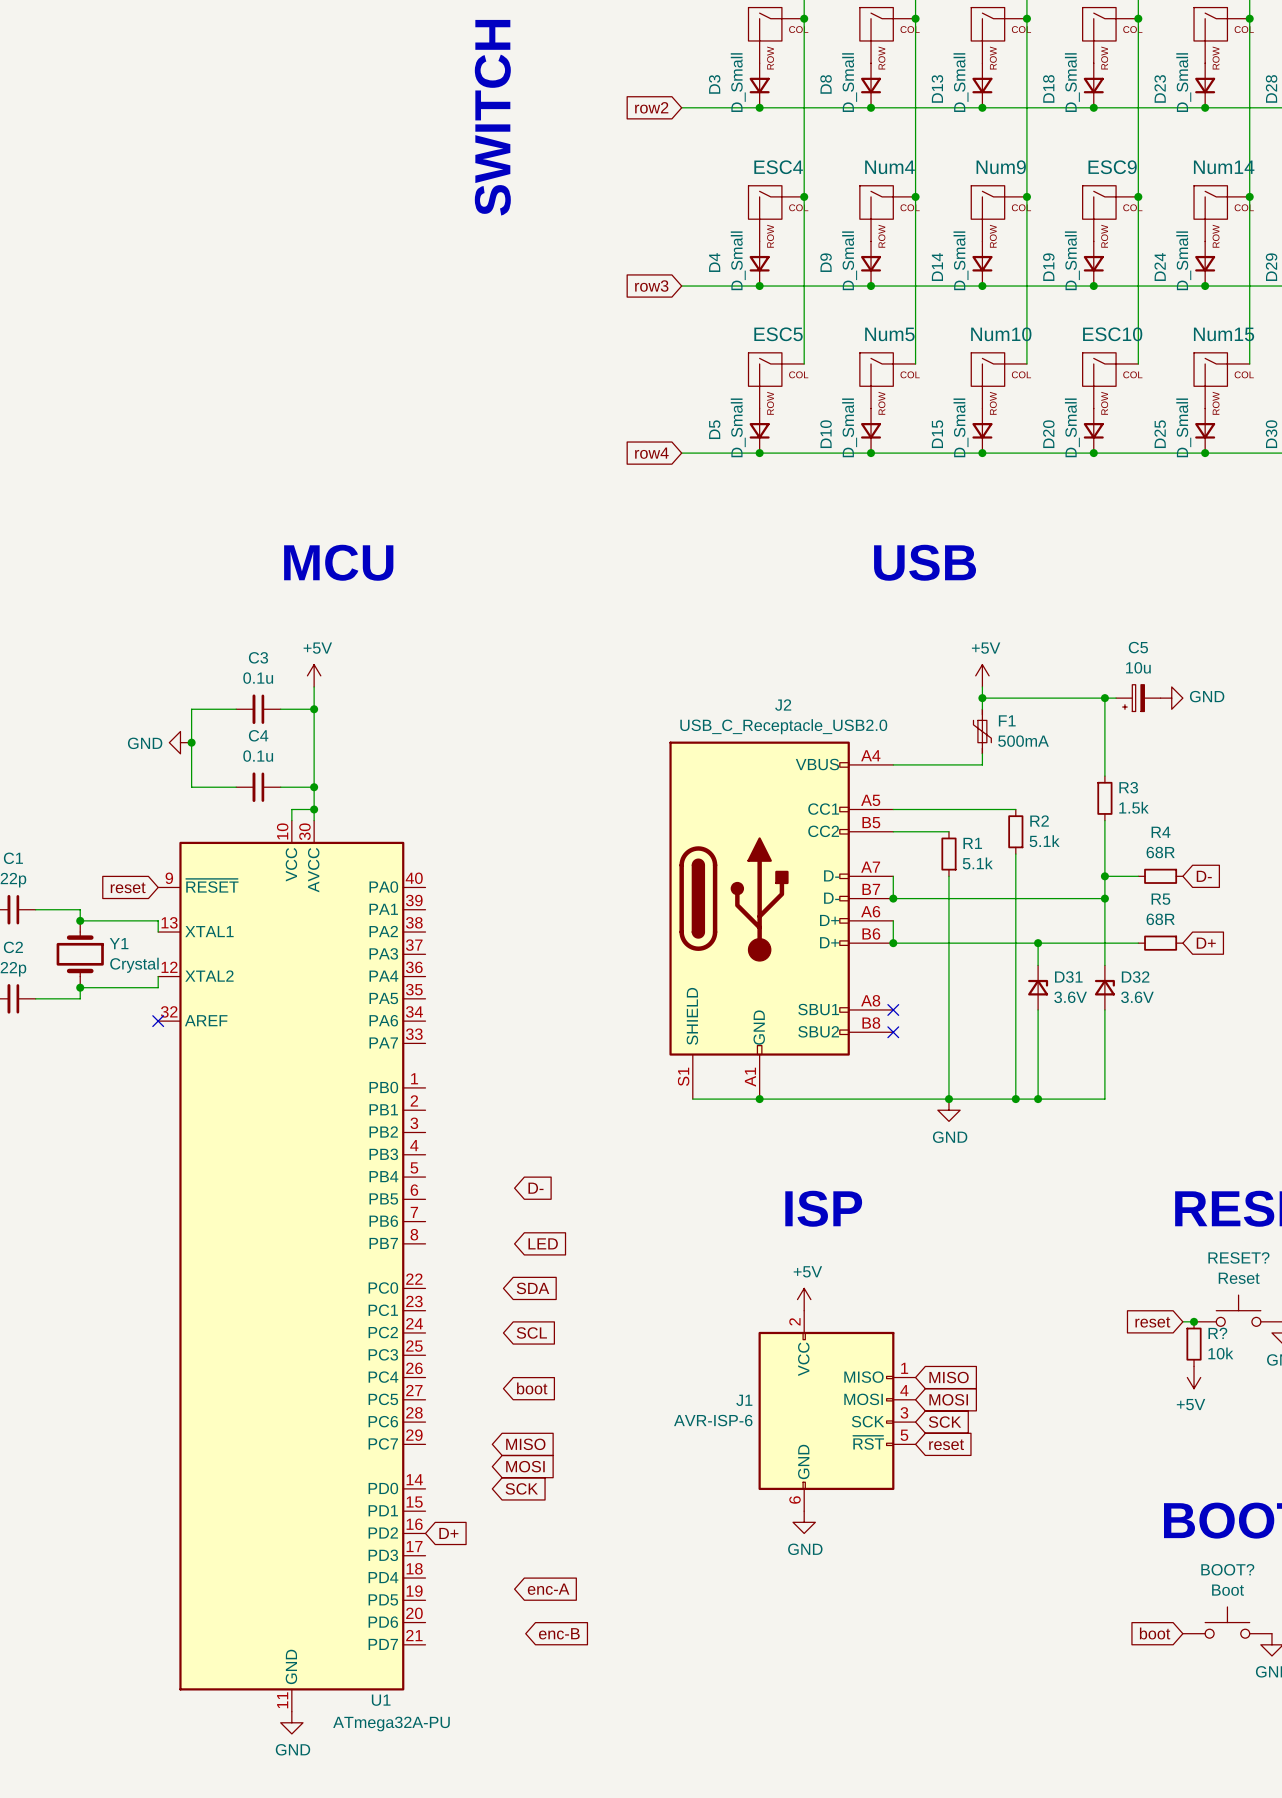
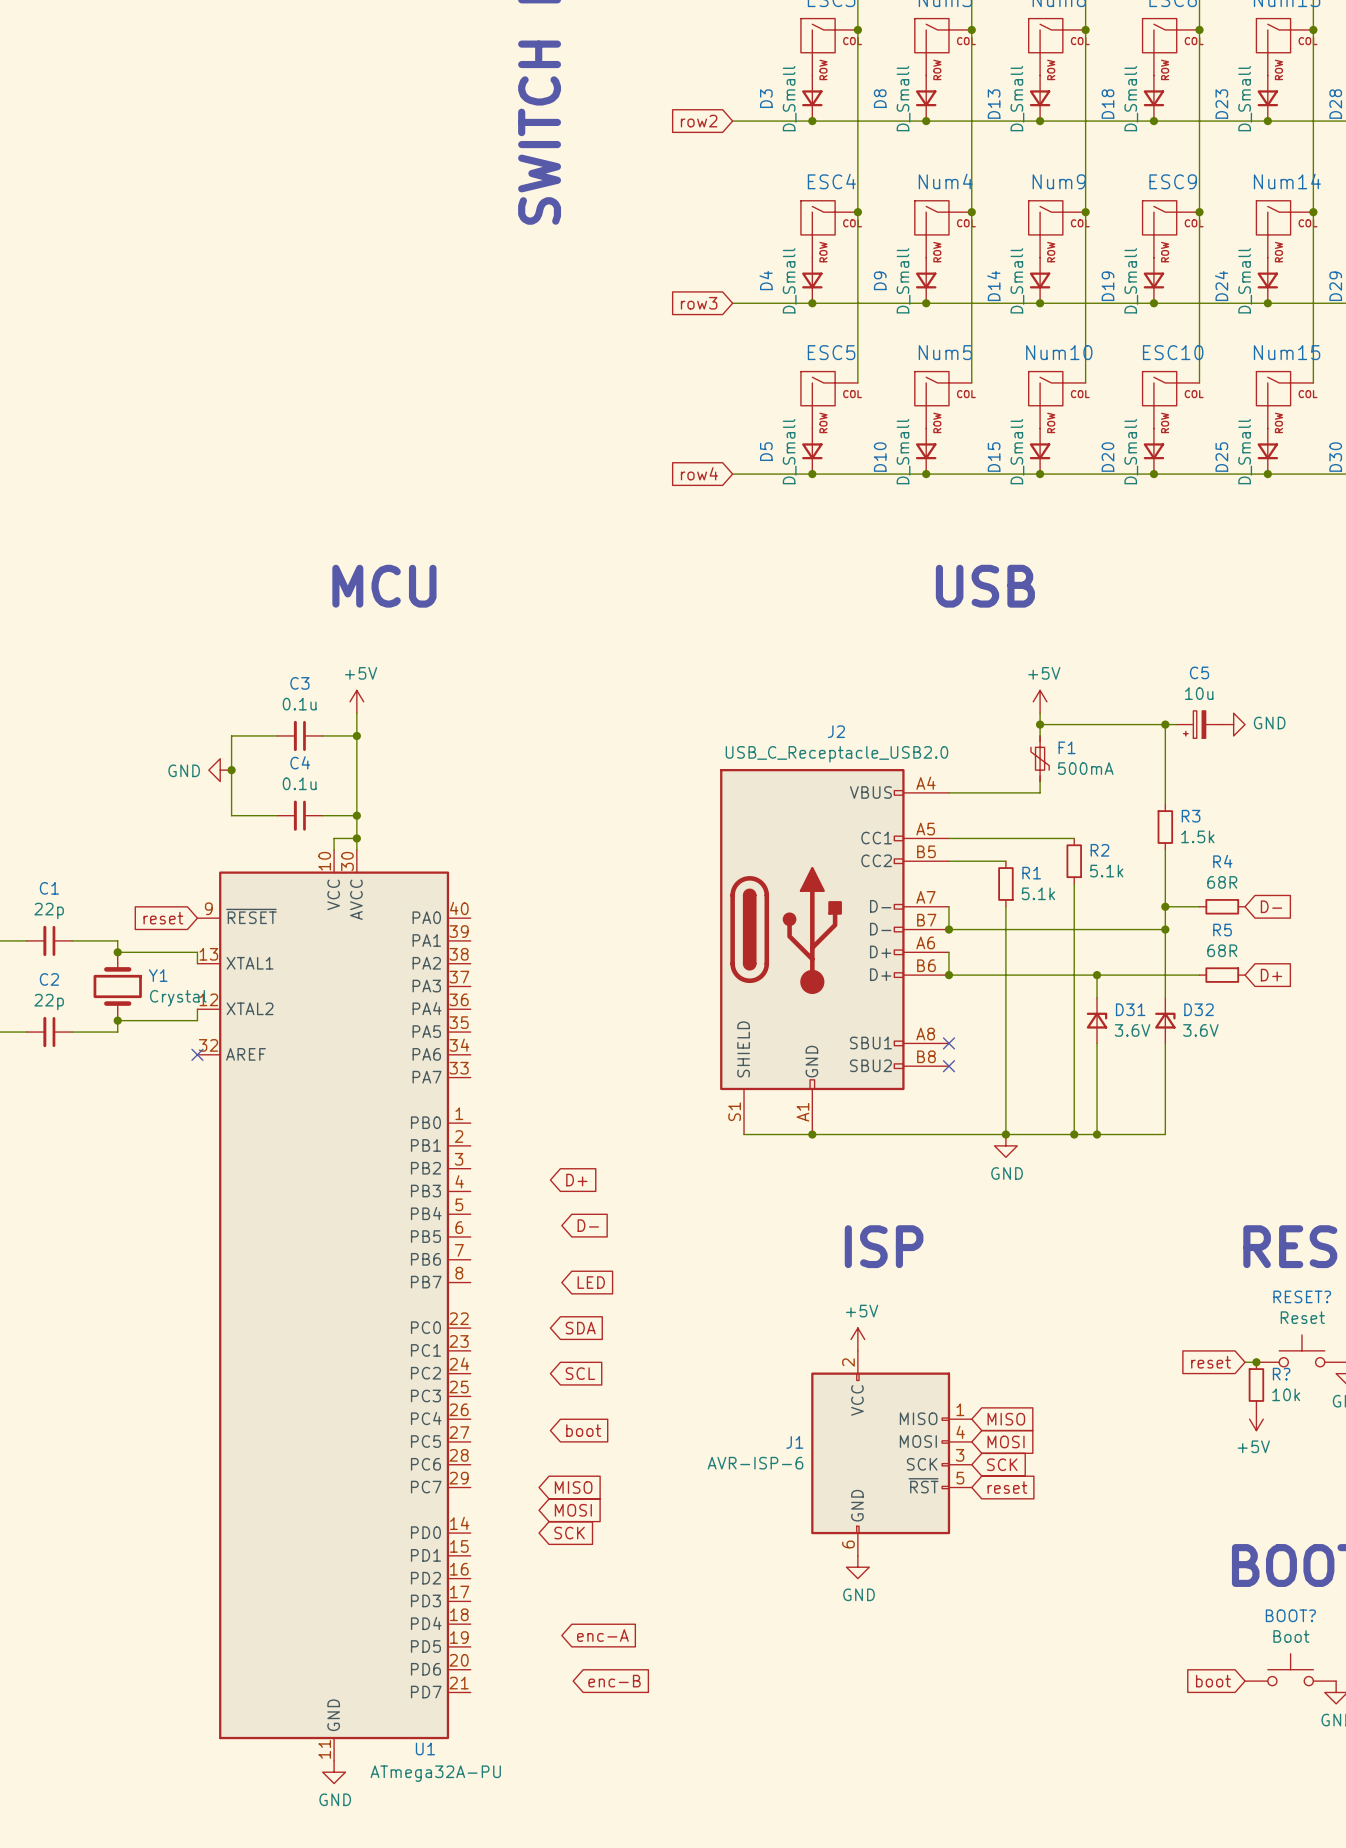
global label: none -> D+ (576, 1180)
global label: D+ (448, 1533) -> none

